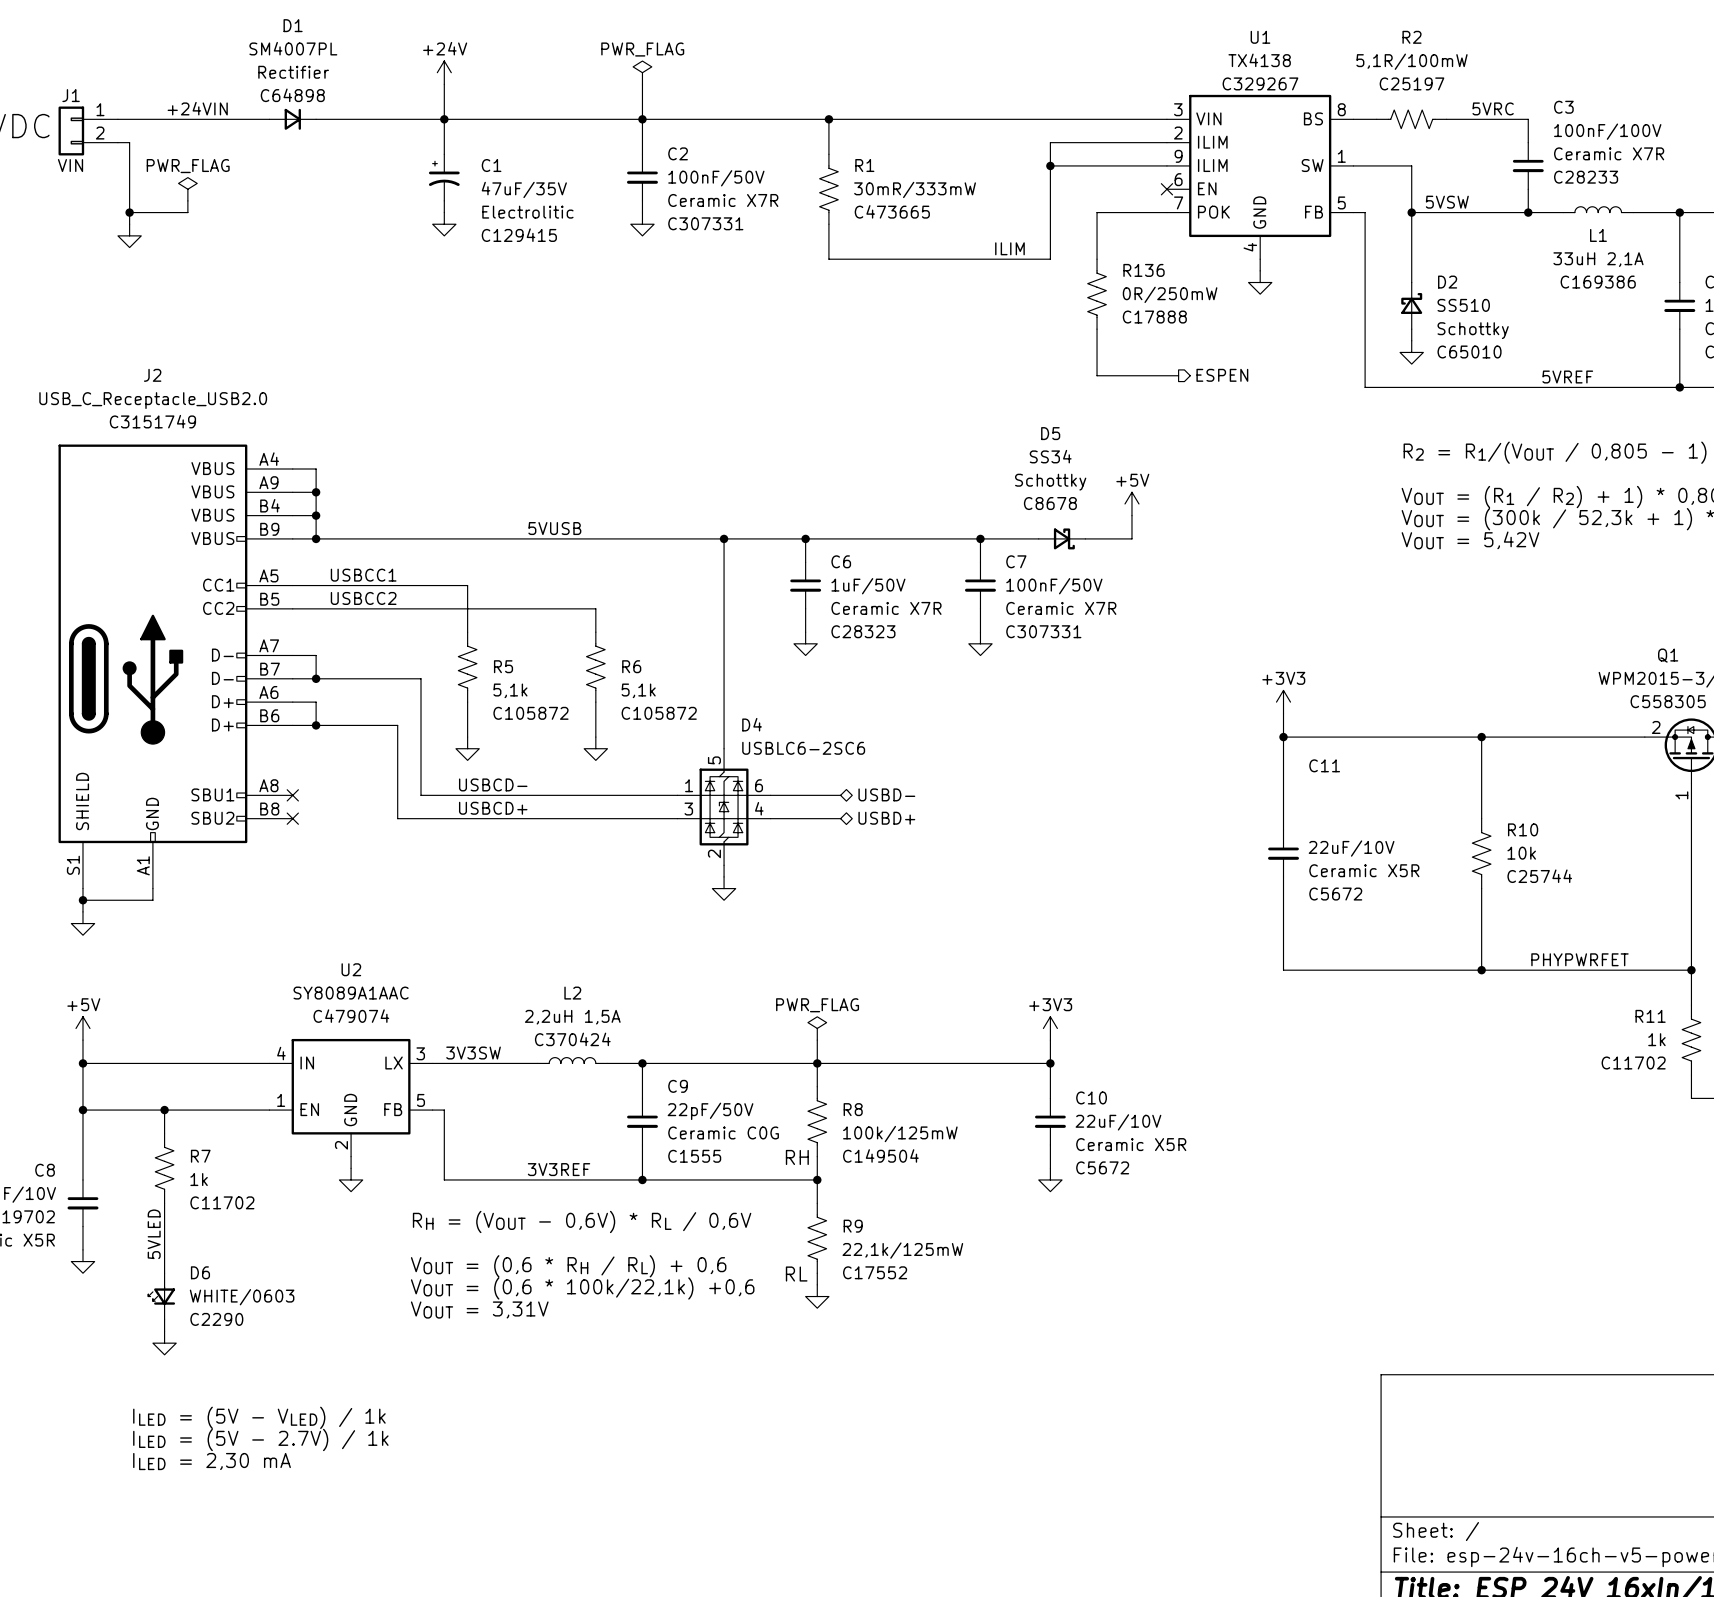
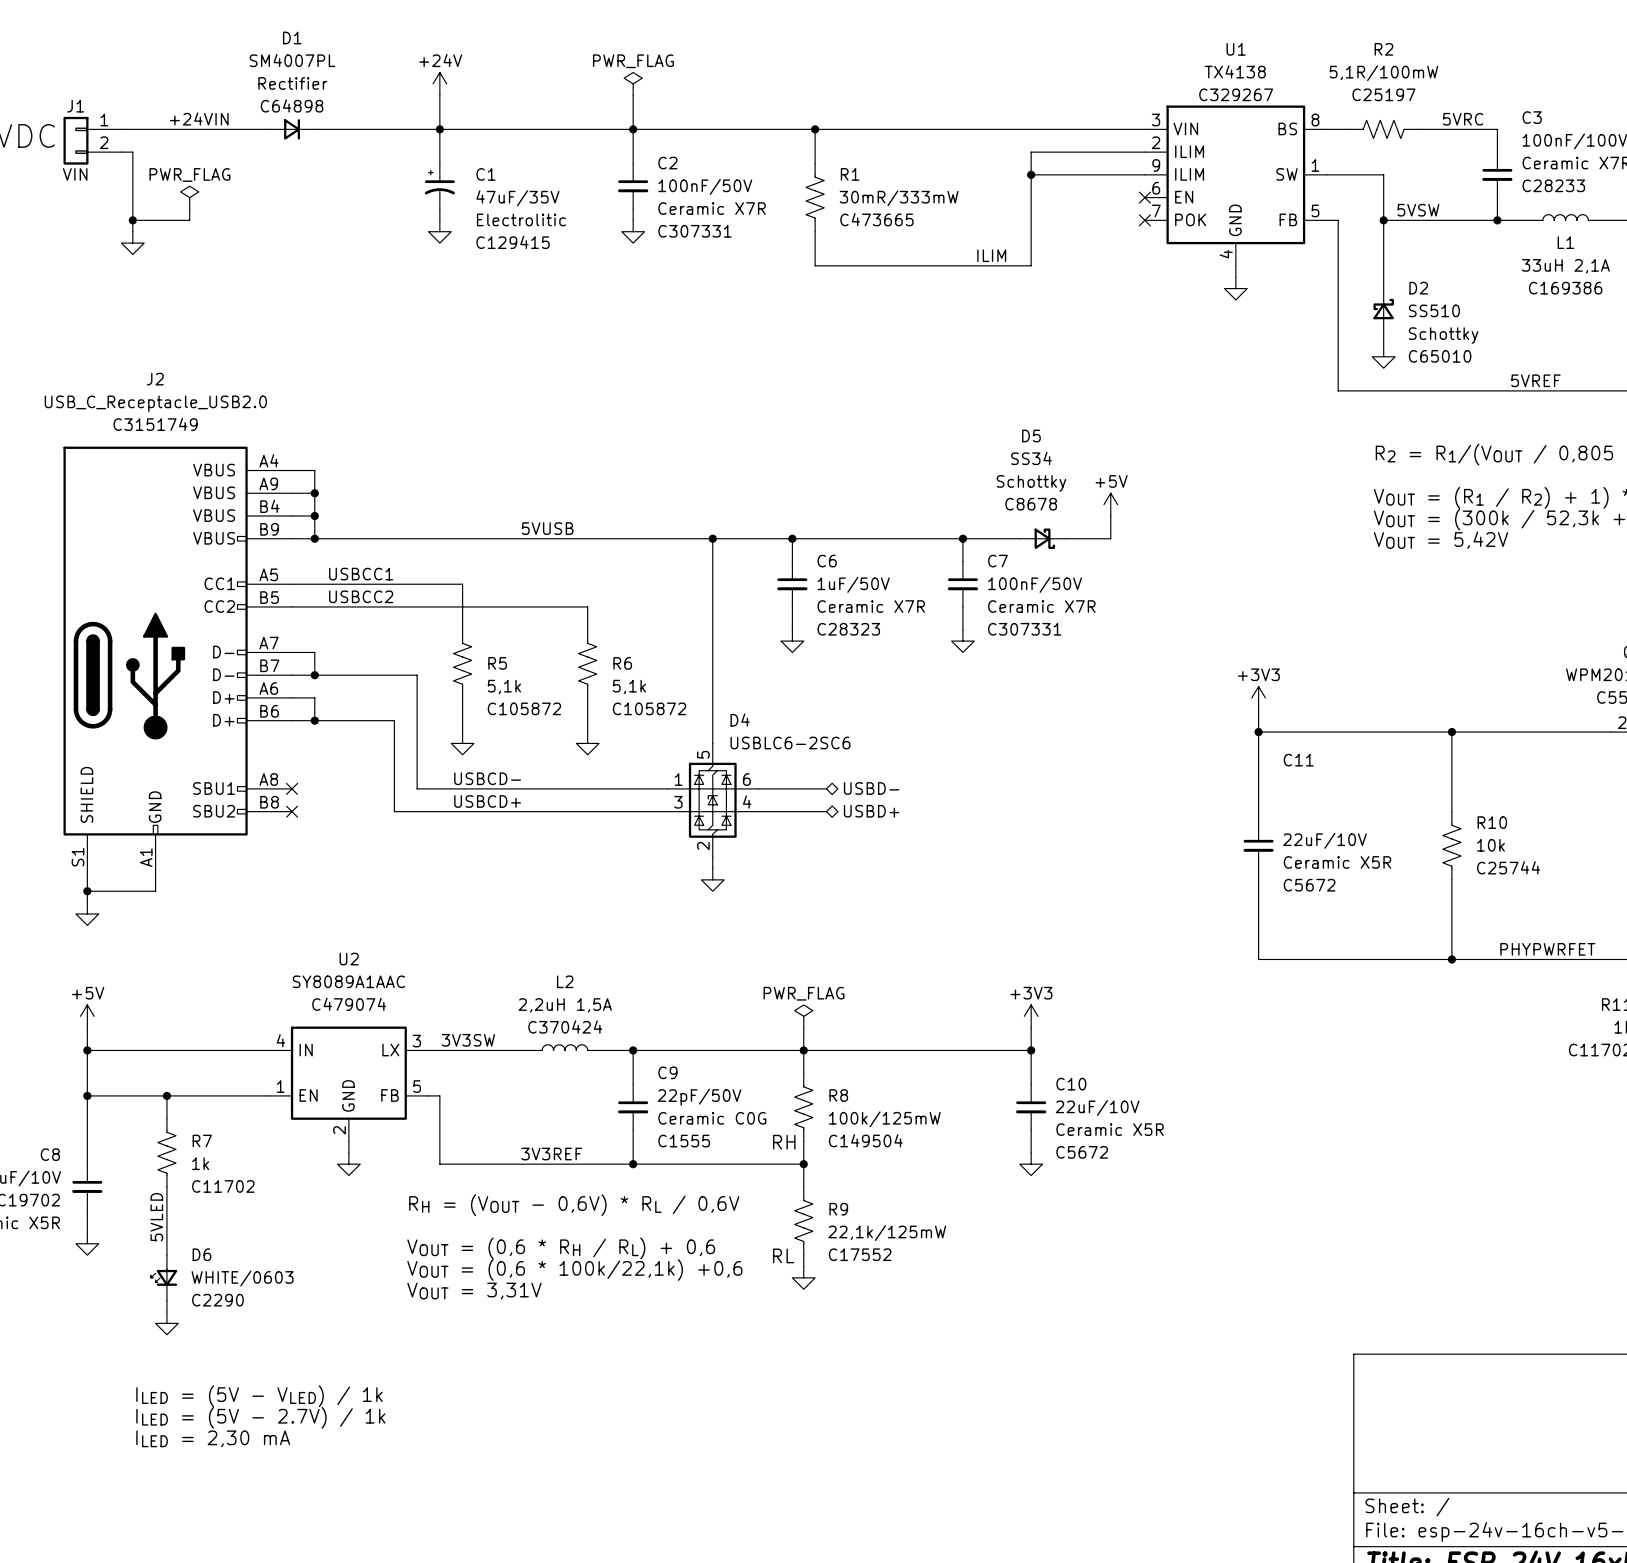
wire: (1166, 212) (1097, 212) (1097, 259) -> none
no-connect mark: none -> (1144, 220)
R136: 0R/250mW (1097, 294) -> none
wire: (1097, 329) (1097, 375) (1178, 375) -> none
hierarchical label: ESPEN (1222, 375) -> none

